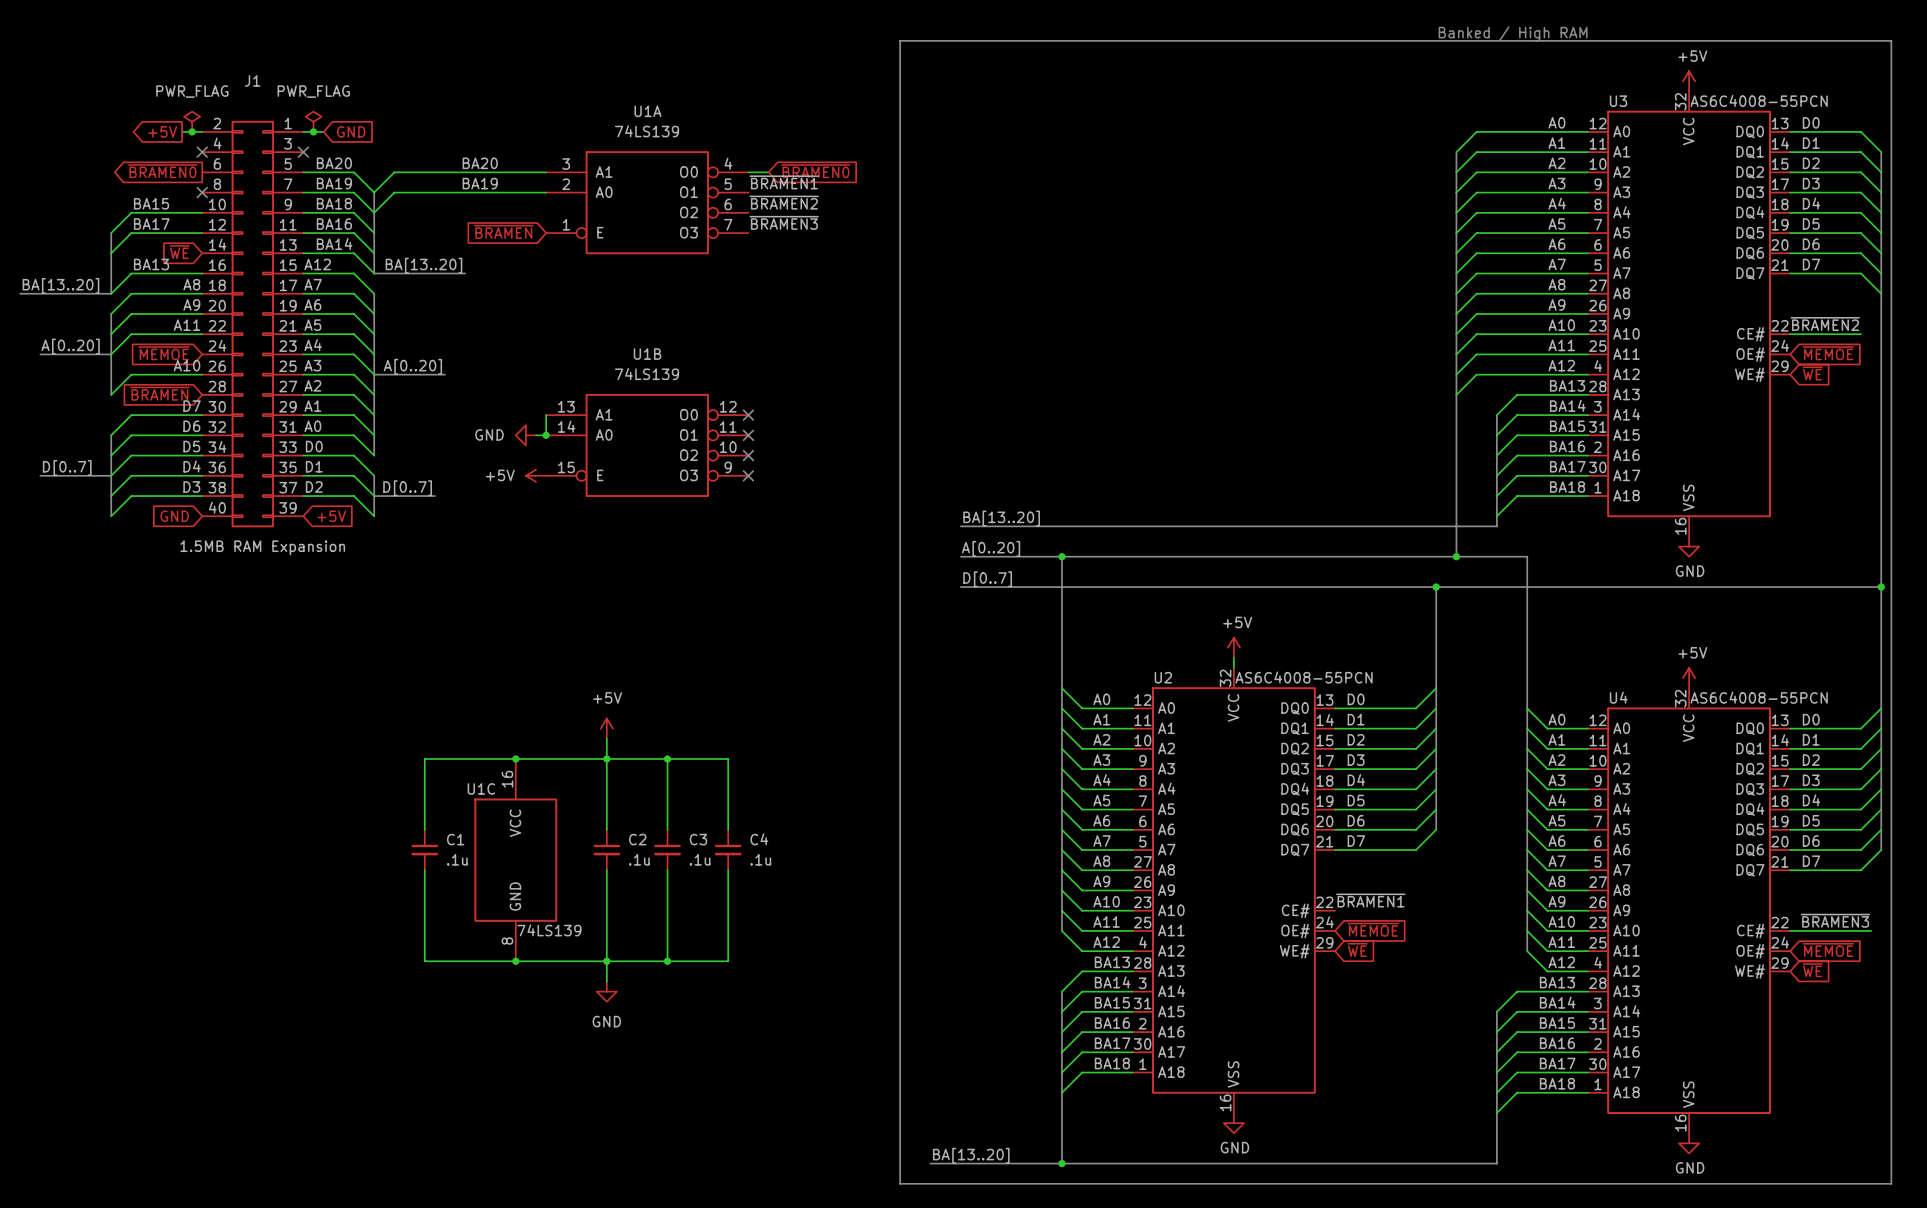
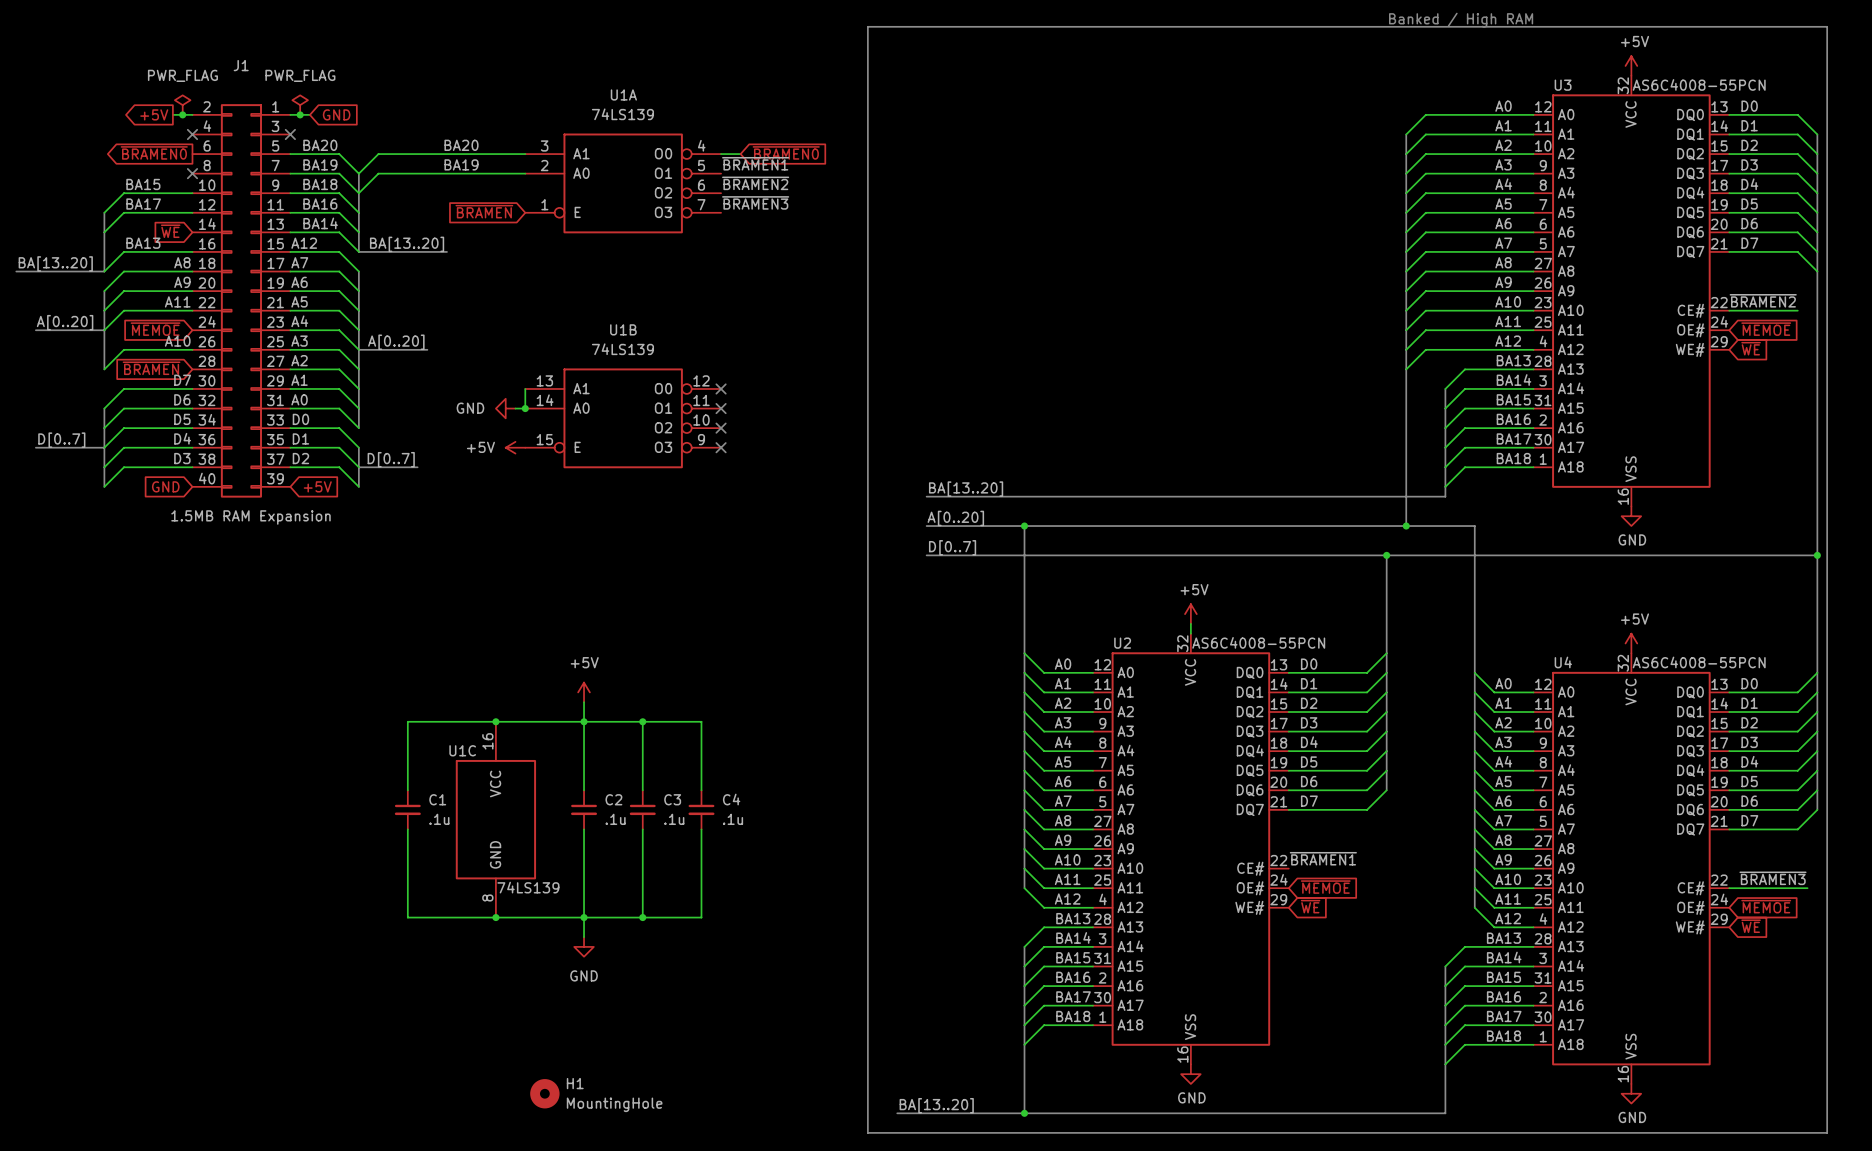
H1: none -> MountingHole (544, 1093)

